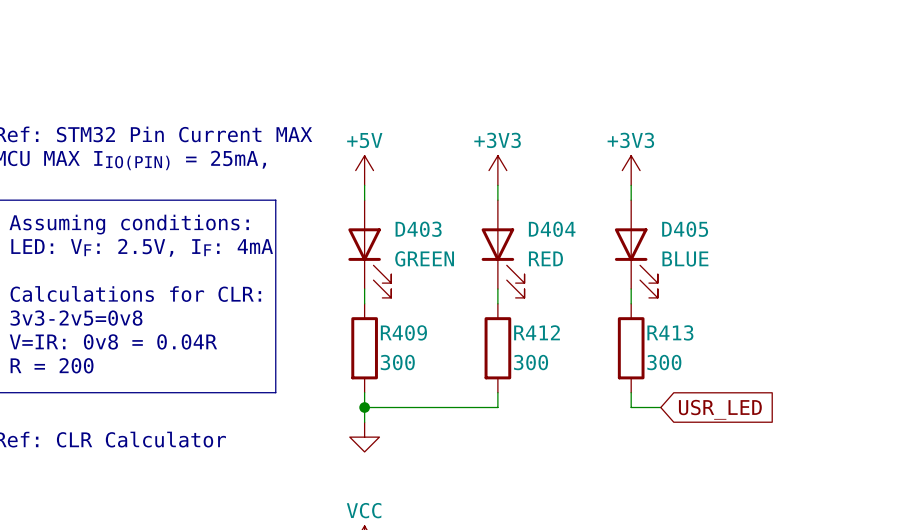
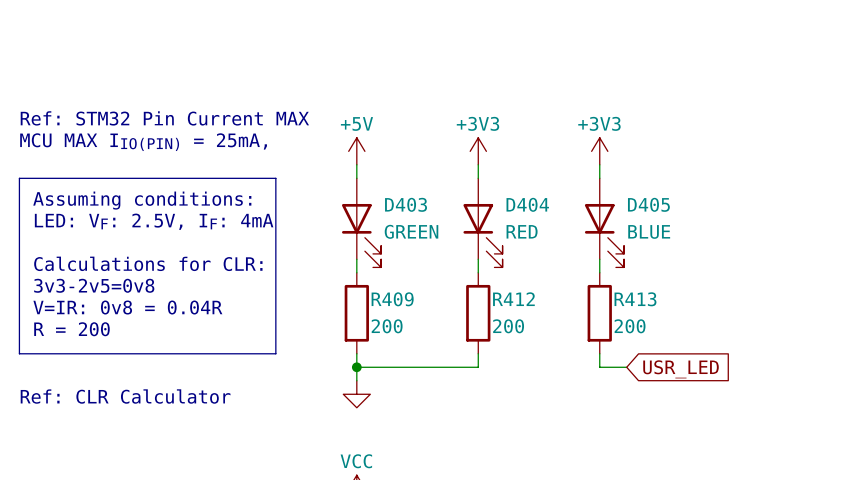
R409 value: 300 (397, 362) -> 200 (387, 326)
R412 value: 300 (531, 362) -> 200 (508, 326)
R413 value: 300 (664, 362) -> 200 (630, 326)

